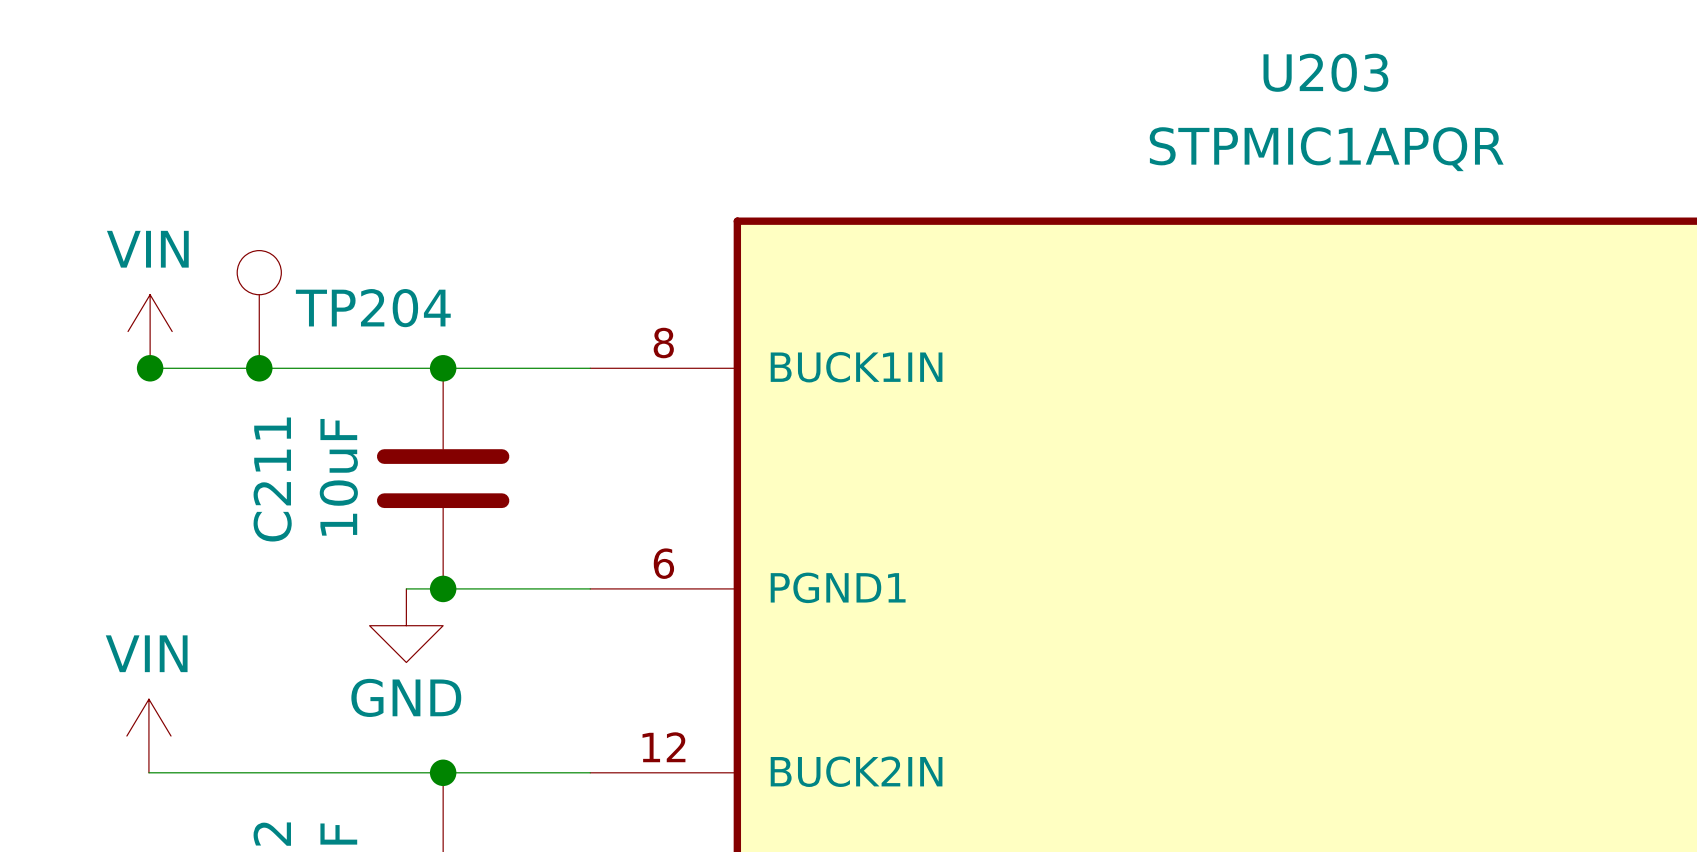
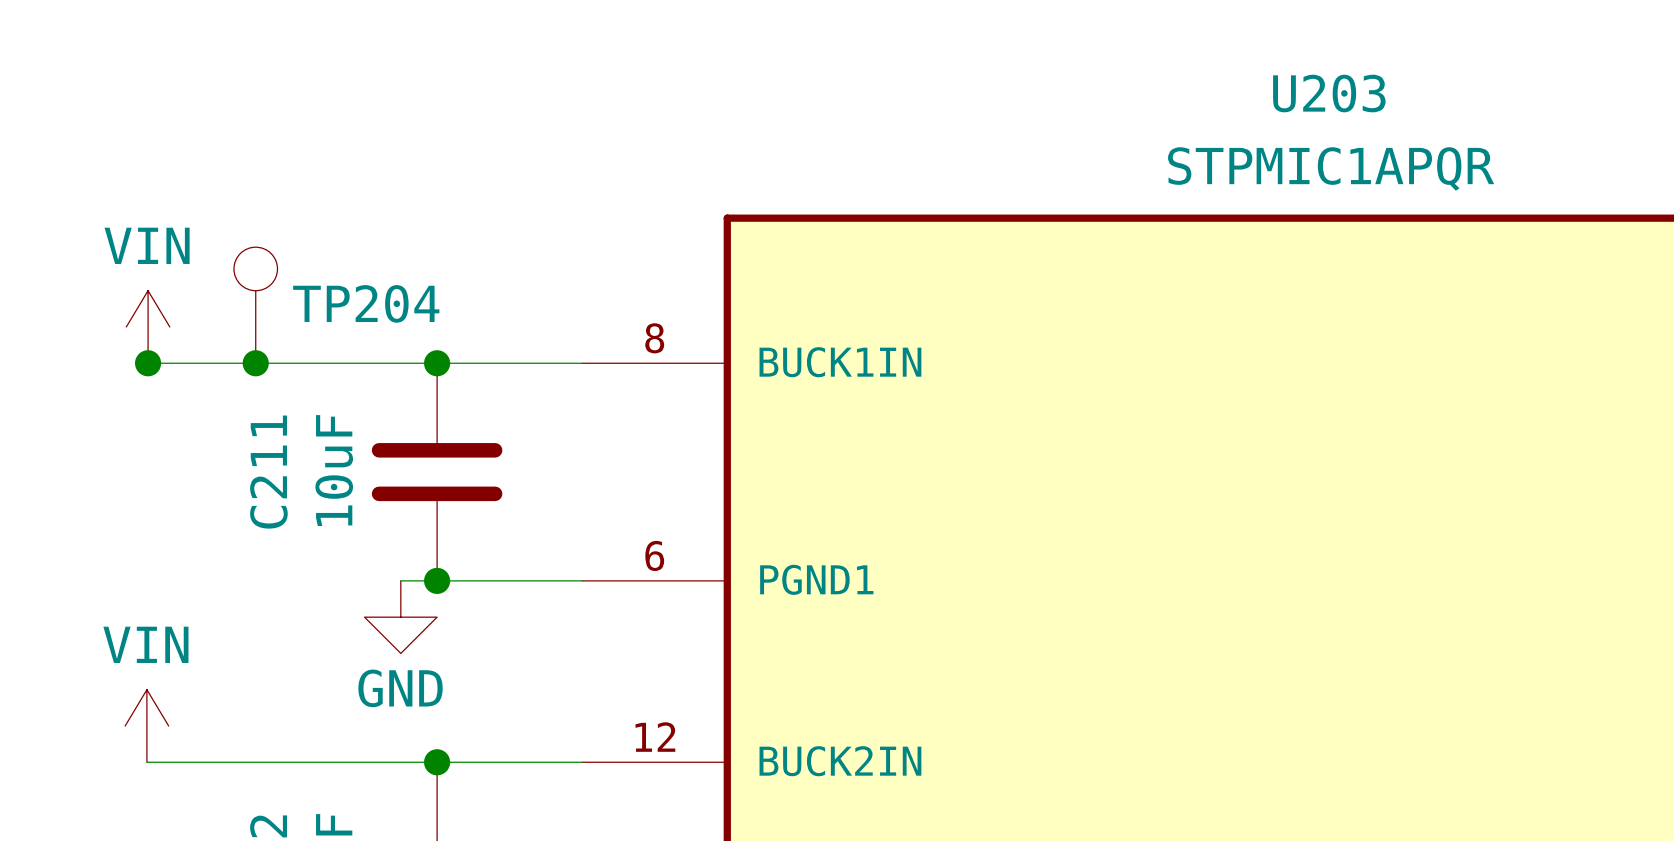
U203 name position: U203 (1325, 72) -> U203 (1329, 93)
U203 value position: STPMIC1APQR (1326, 149) -> STPMIC1APQR (1331, 168)

